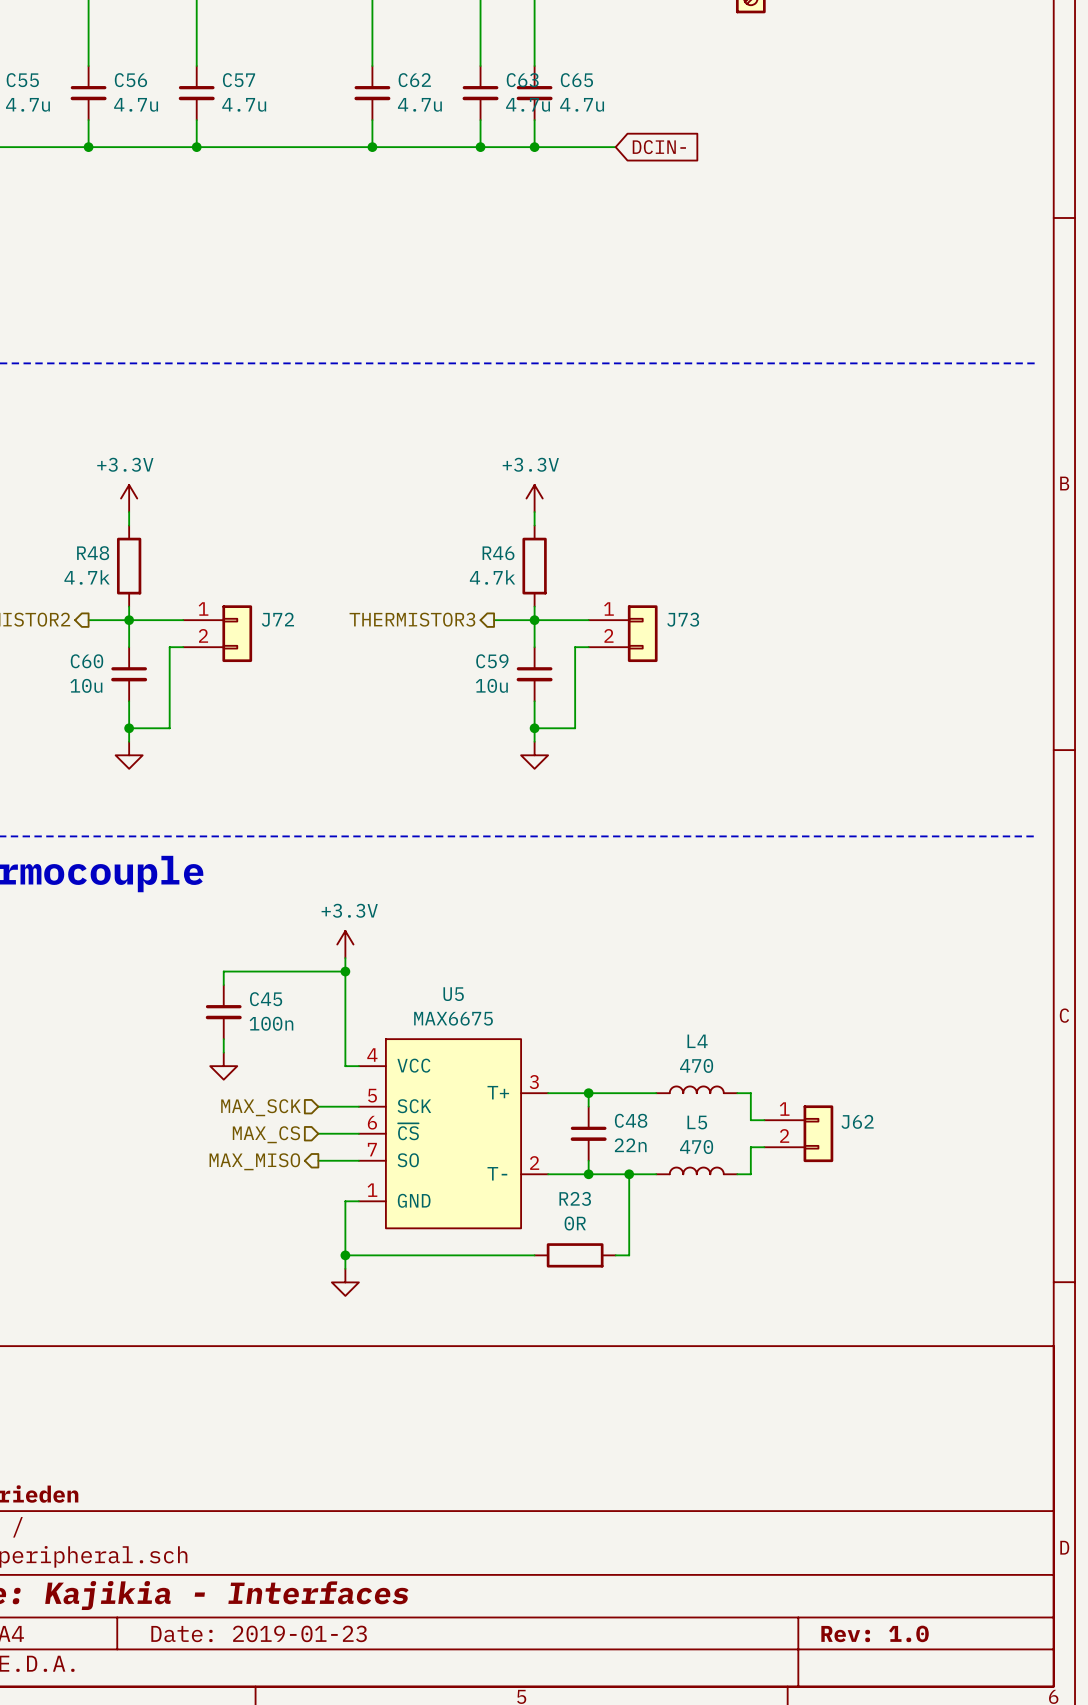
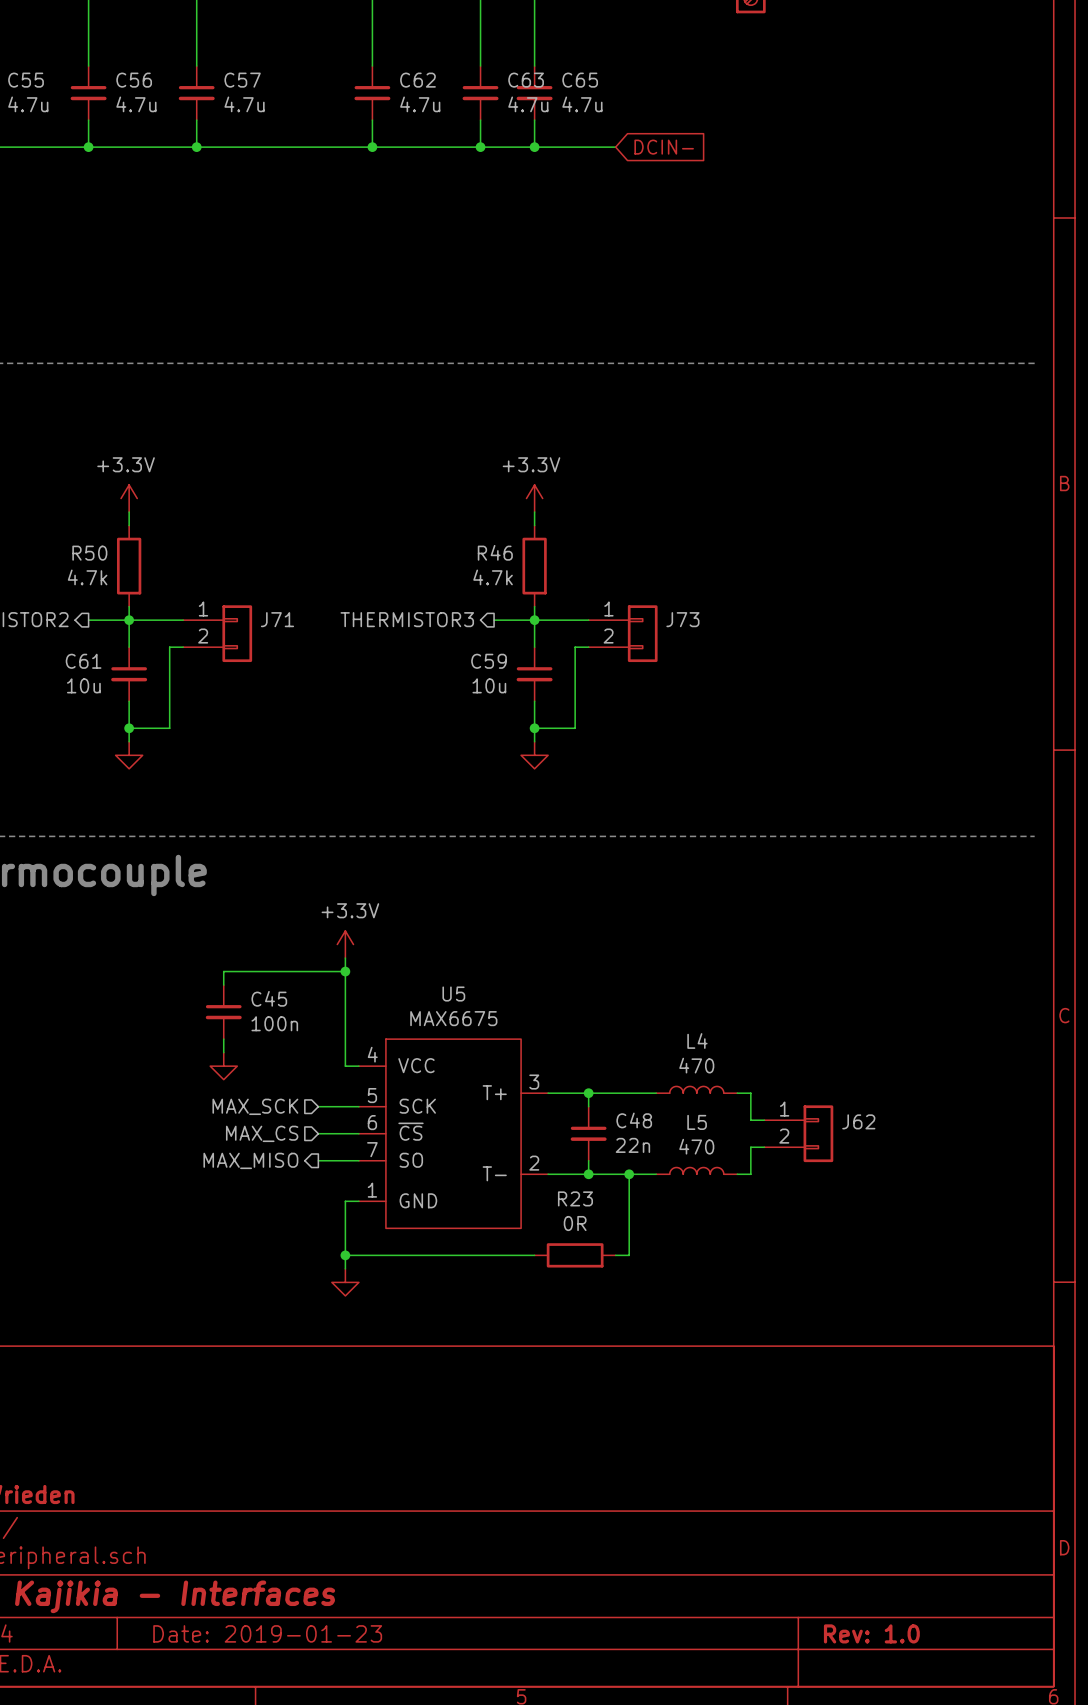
R48 name: R48 (93, 553) -> R50 (89, 553)
J72 name: J72 (277, 619) -> J71 (277, 619)
C60 name: C60 (86, 661) -> C61 (83, 661)

